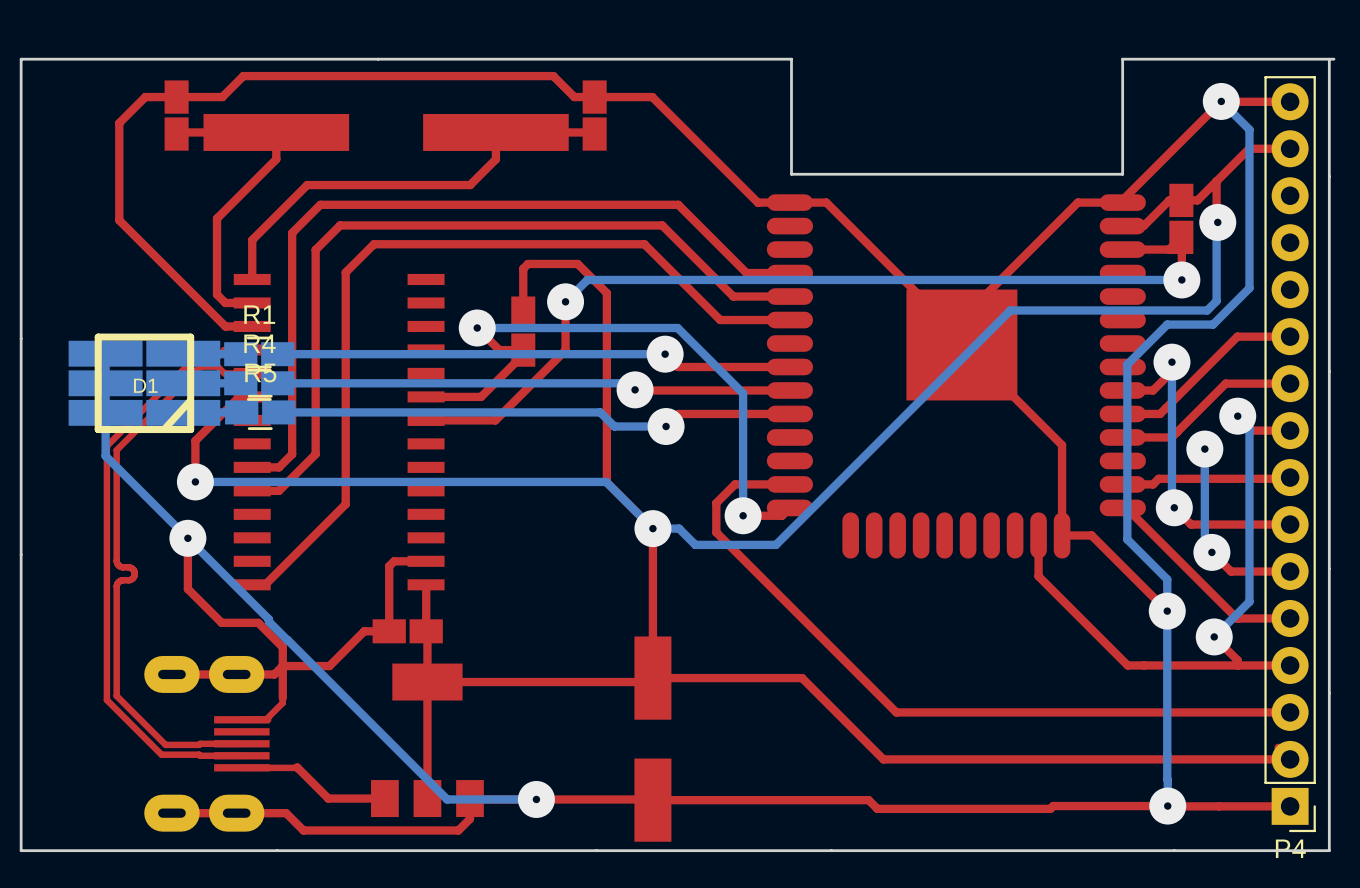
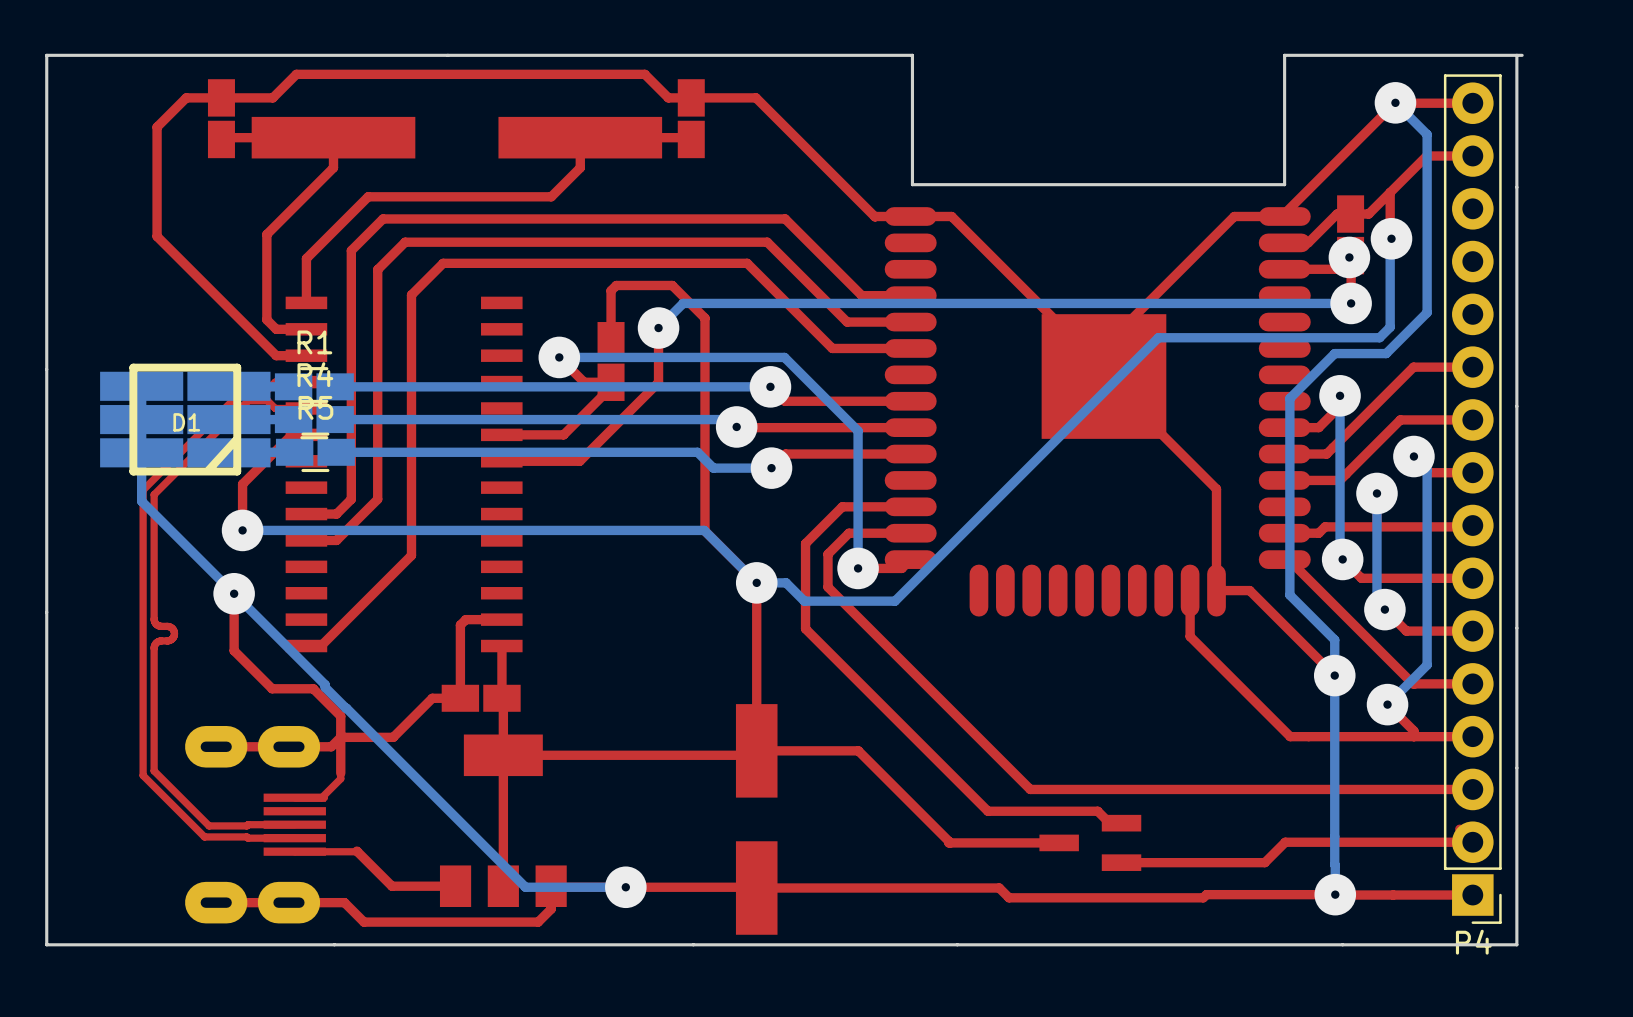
via: none -> (1349, 257)
top track: none -> (910, 506) (842, 506) (805, 543) (805, 628) (987, 811) (1097, 811) (1109, 823) (1121, 823)
top track: (743, 678) (802, 678) (883, 759) (1123, 759) -> (858, 750) (948, 842) (1059, 842)
top track: none -> (1285, 842) (1264, 862) (1121, 862)
part: none -> (1090, 842)

